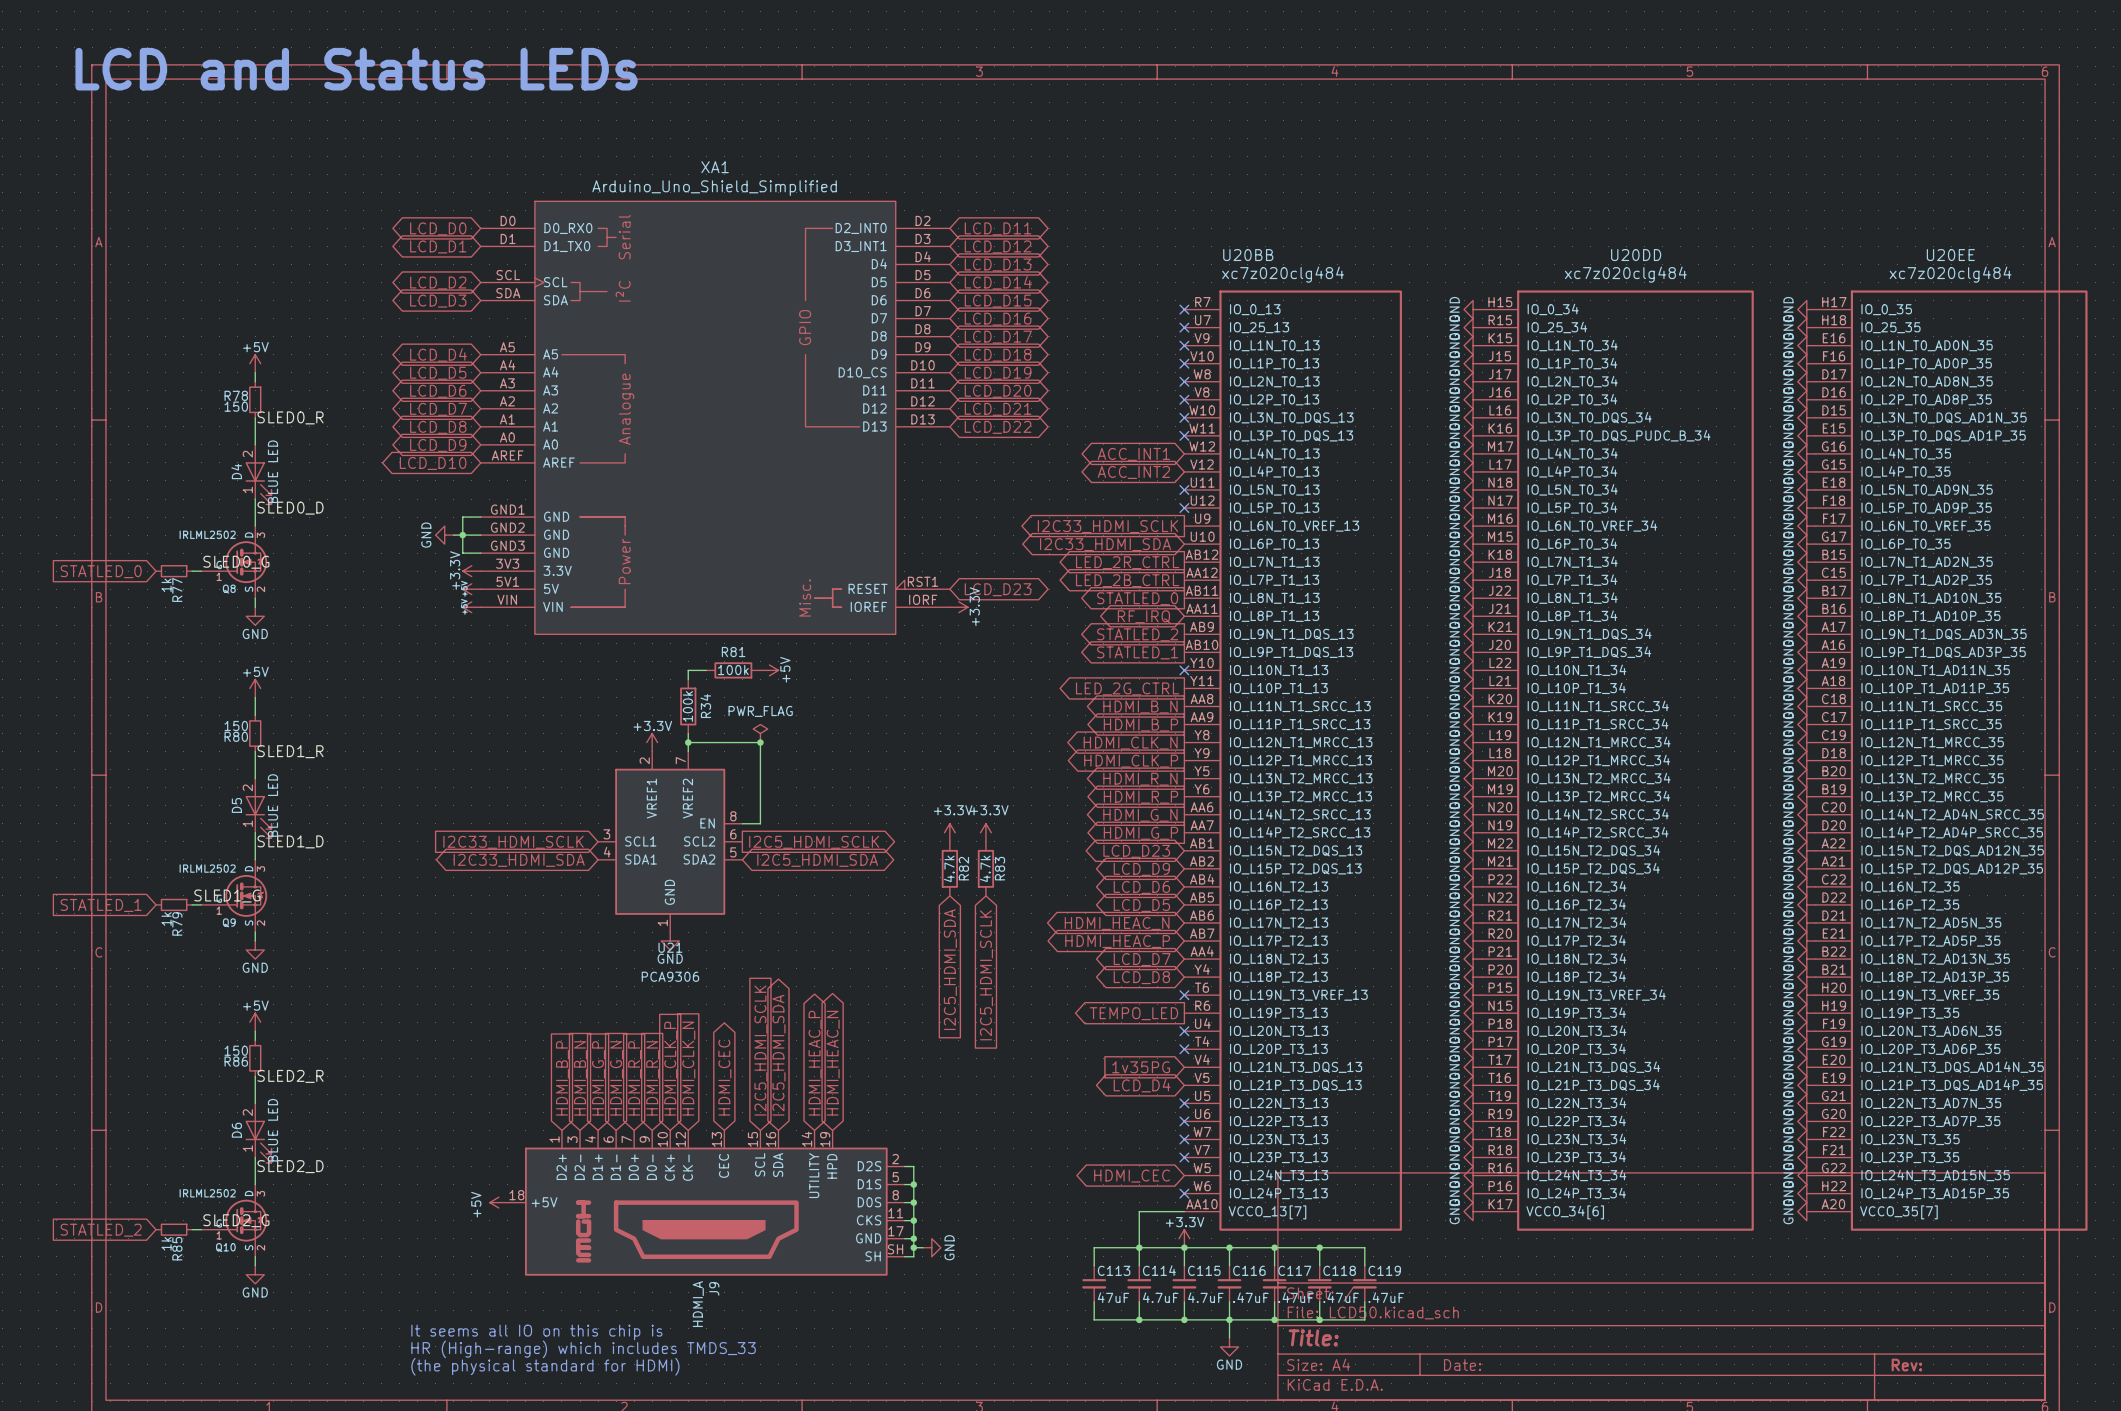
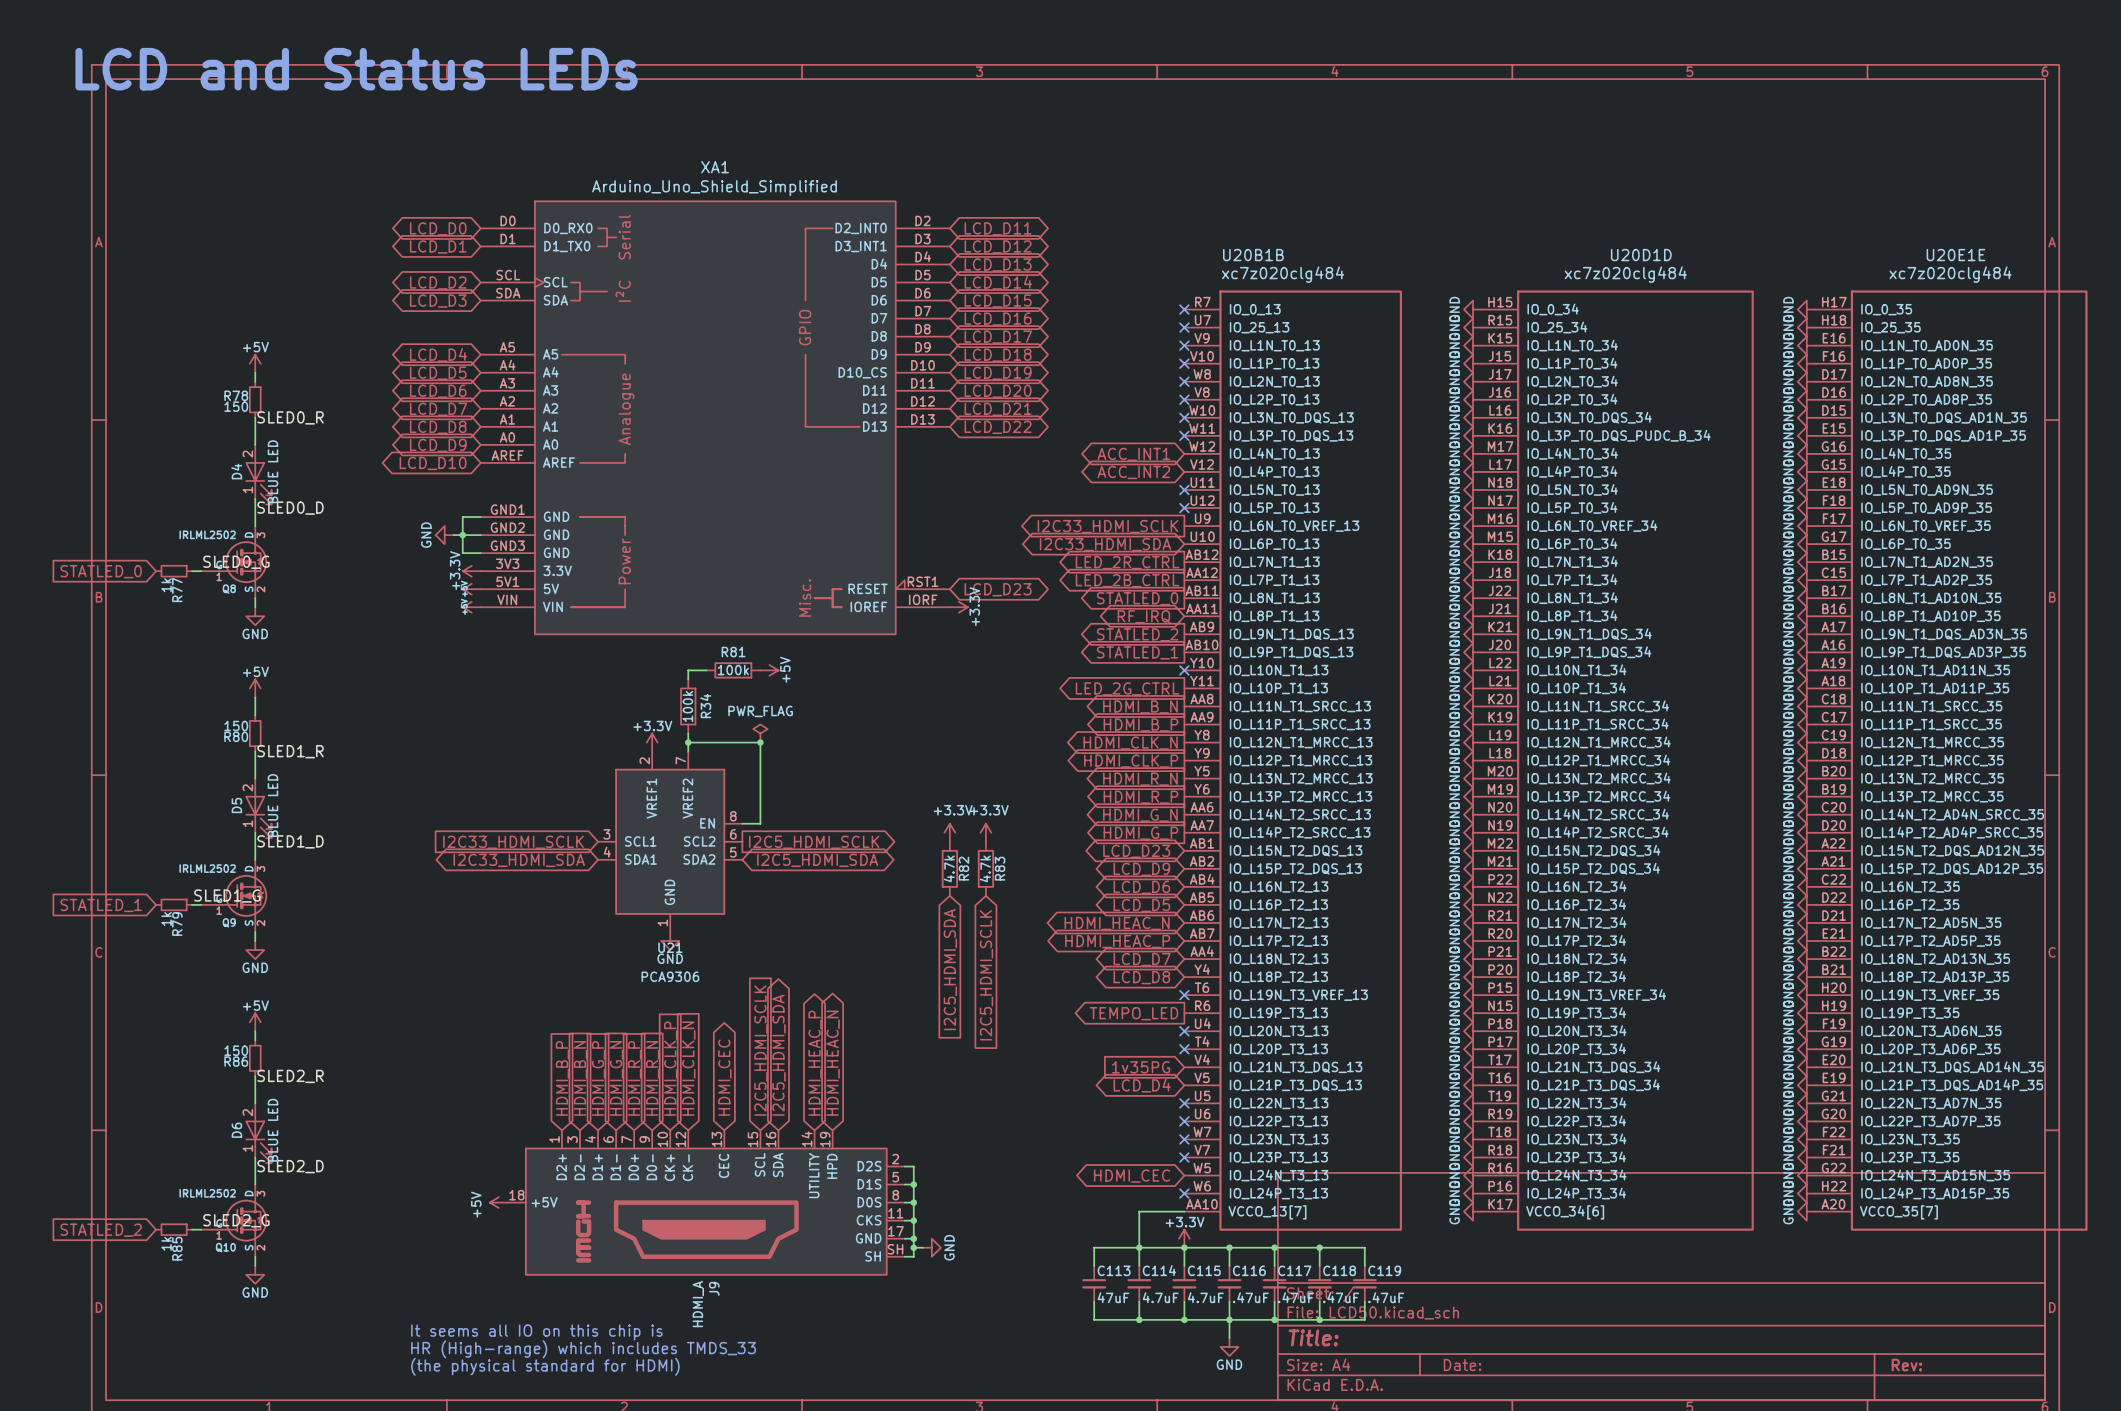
U20BB name: U20BB (1248, 255) -> U20B1B (1253, 255)
U20DD name: U20DD (1636, 255) -> U20D1D (1641, 255)
U20EE name: U20EE (1950, 255) -> U20E1E (1955, 255)

